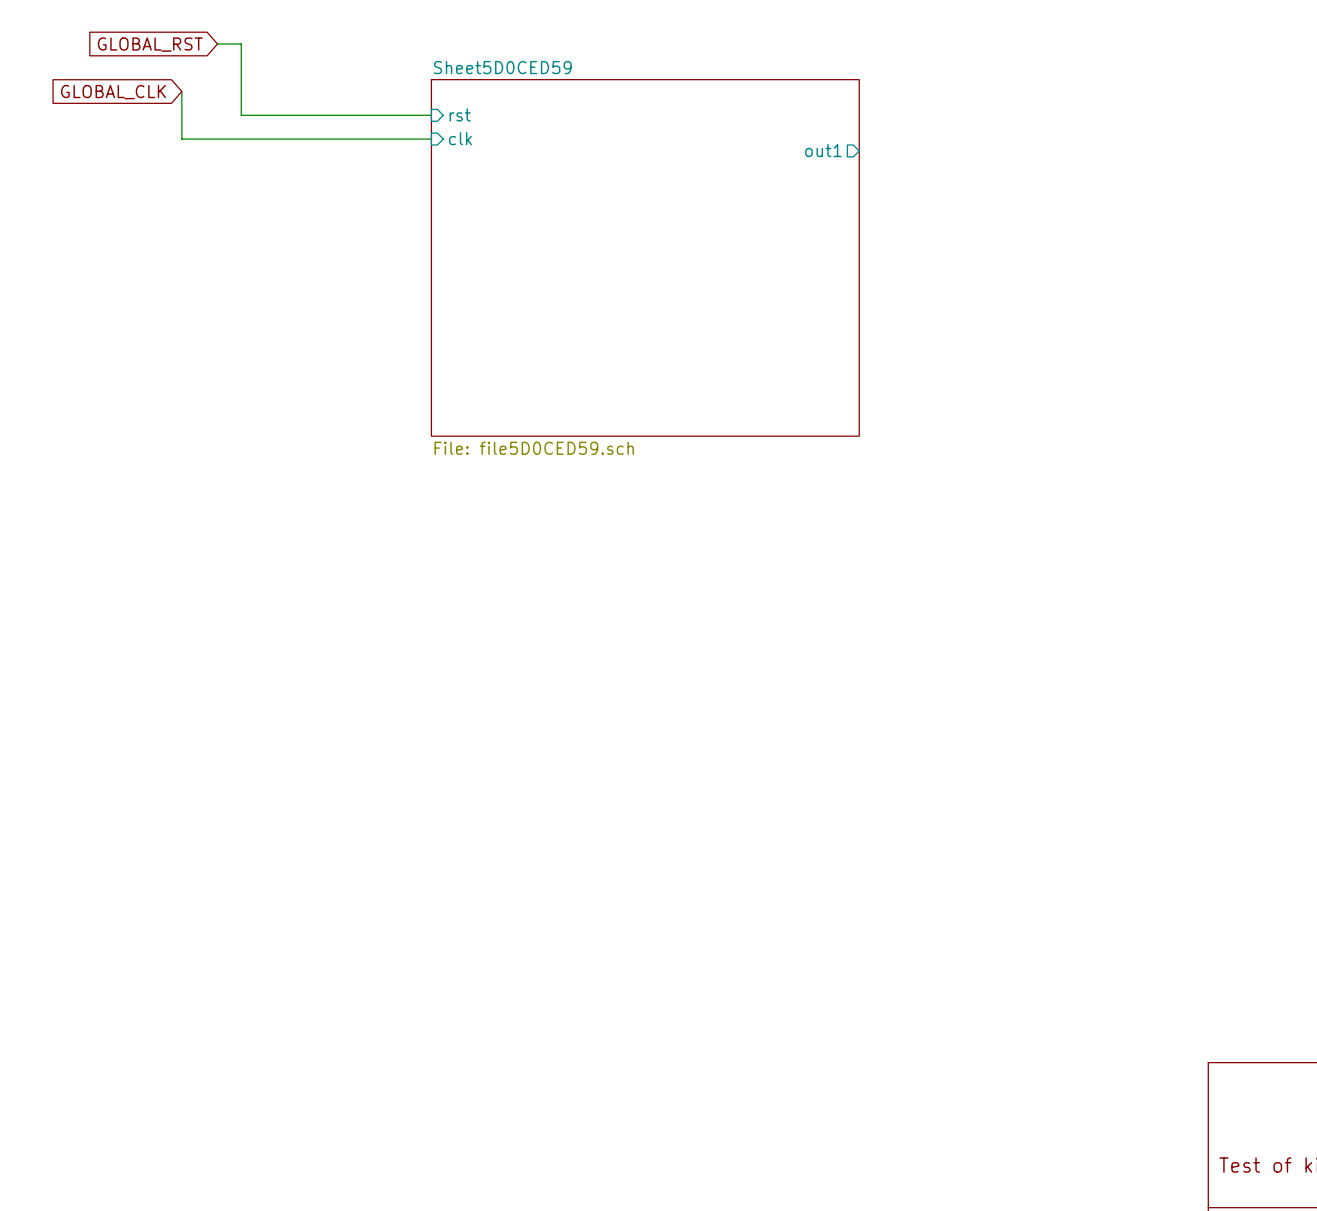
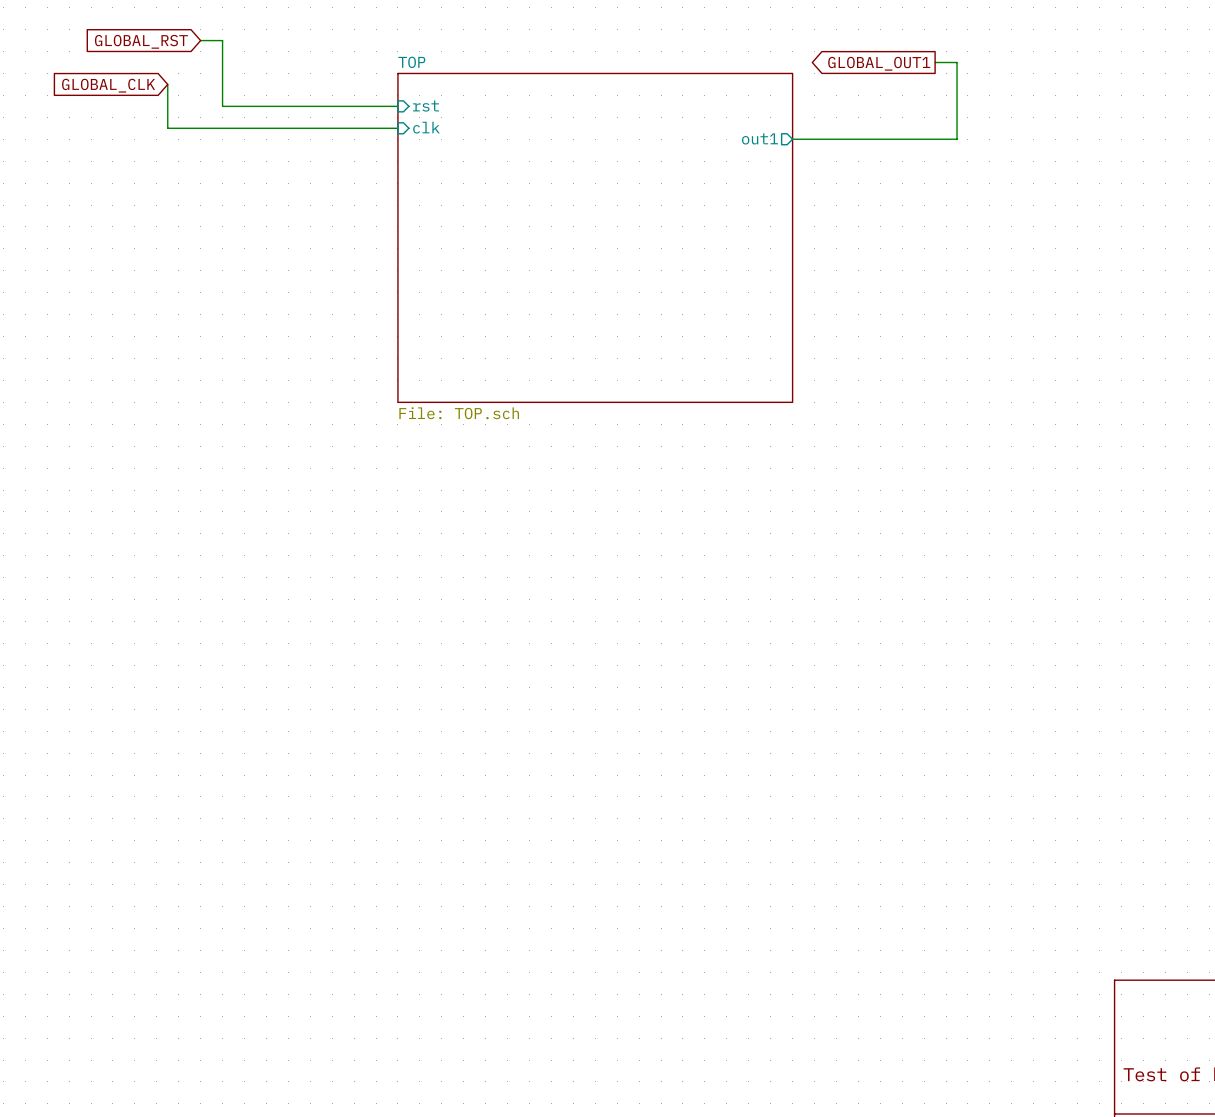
sheet Sheet5D0CED59 name: Sheet5D0CED59 (502, 67) -> TOP (411, 62)
wire: none -> (935, 62) (957, 62) (957, 139) (792, 139)
global label: none -> GLOBAL_OUT1 (879, 63)
sheet Sheet5D0CED59 value: File: file5D0CED59.sch (534, 448) -> File: TOP.sch (459, 413)

